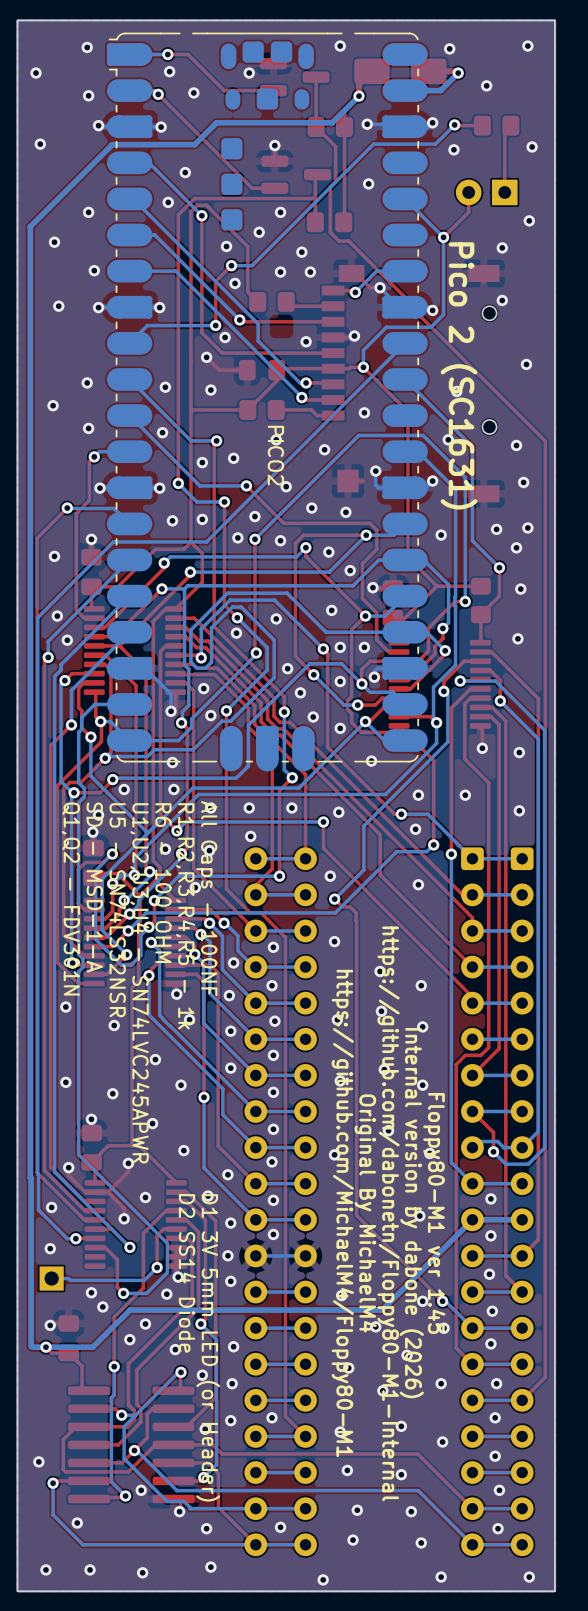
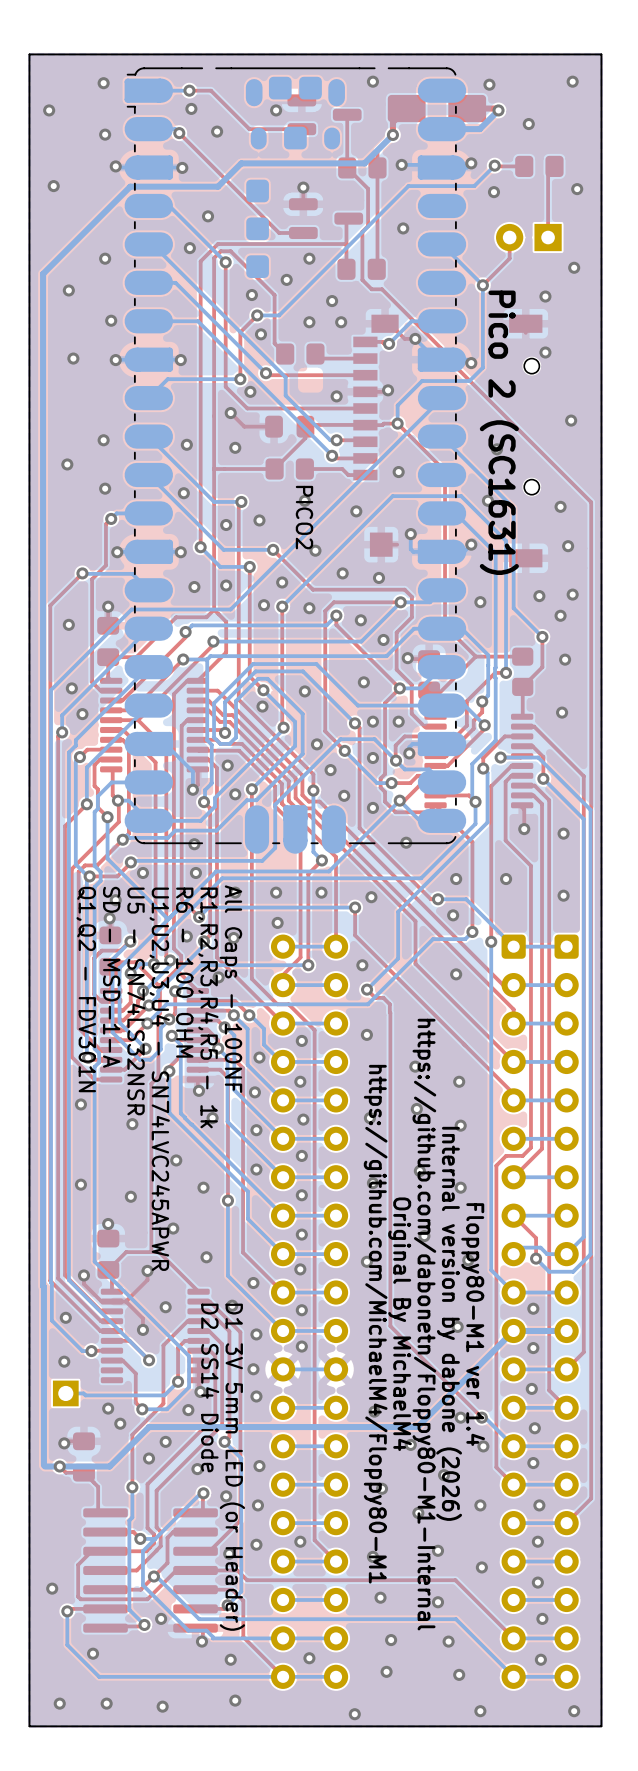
text: Floppy80-M1 ver 1.45 (434, 1213) -> Floppy80-M1 ver 1.4 (473, 1324)

